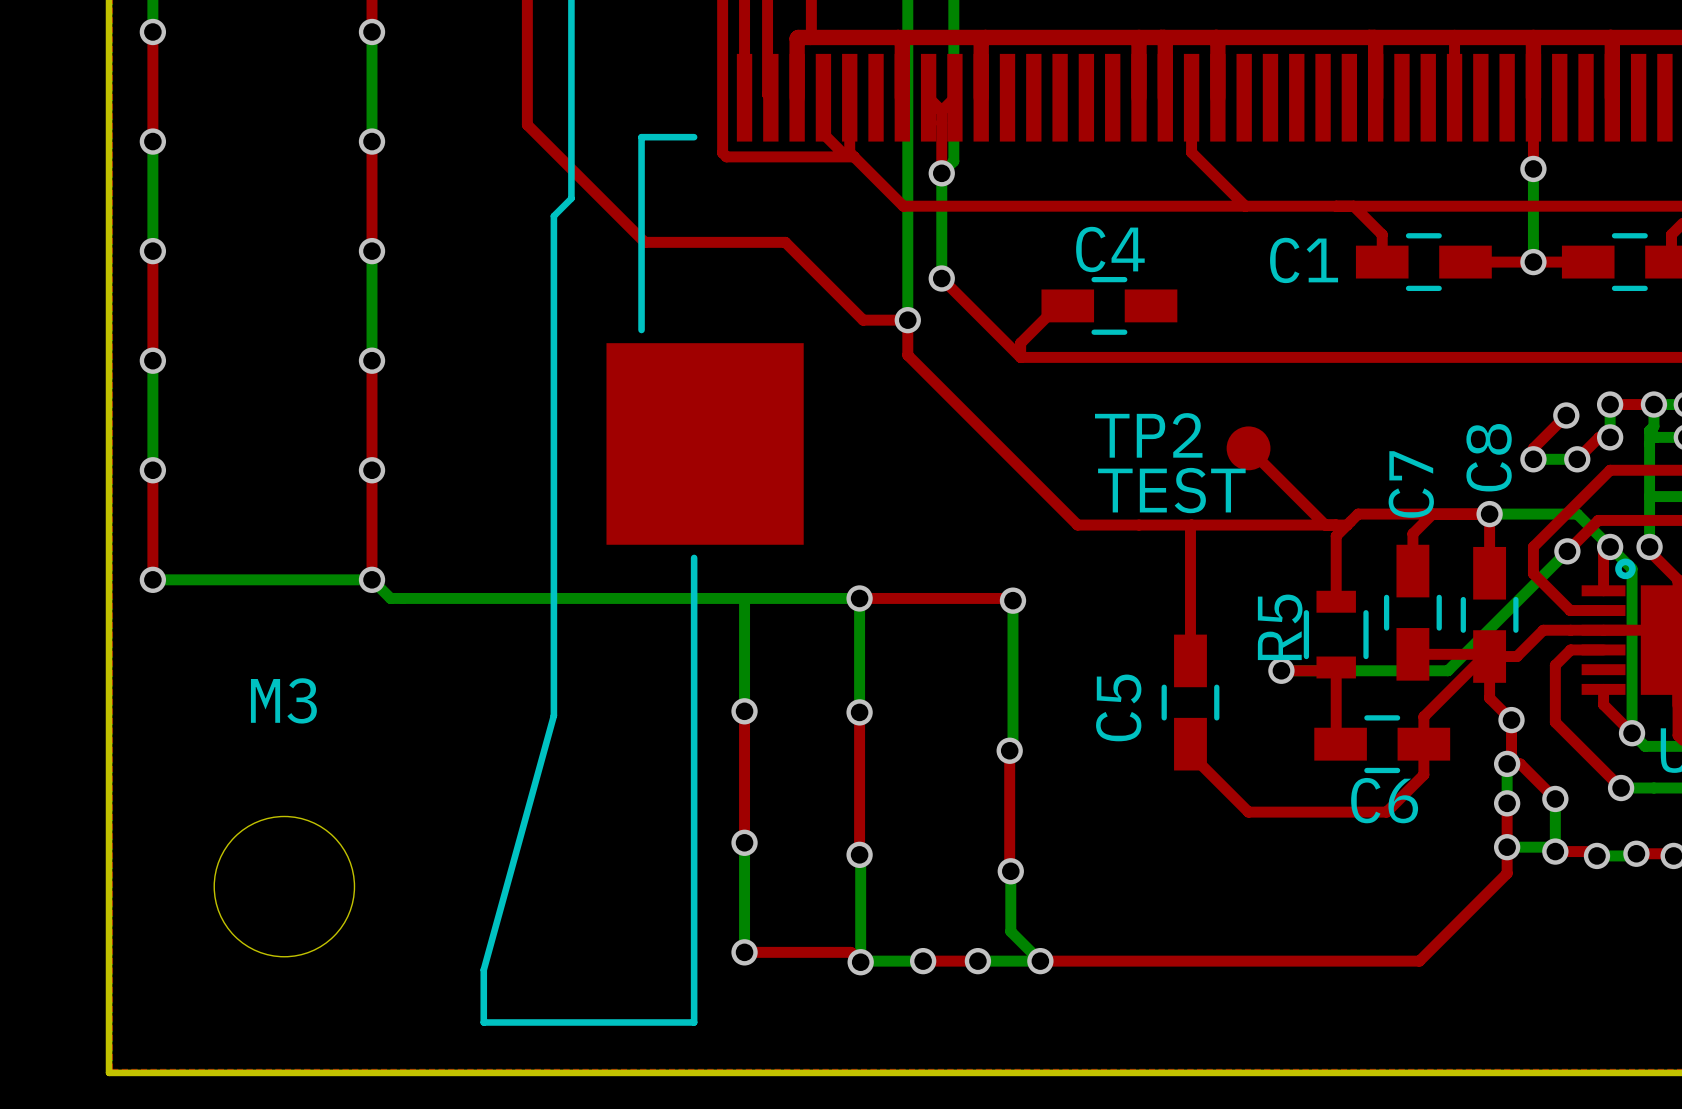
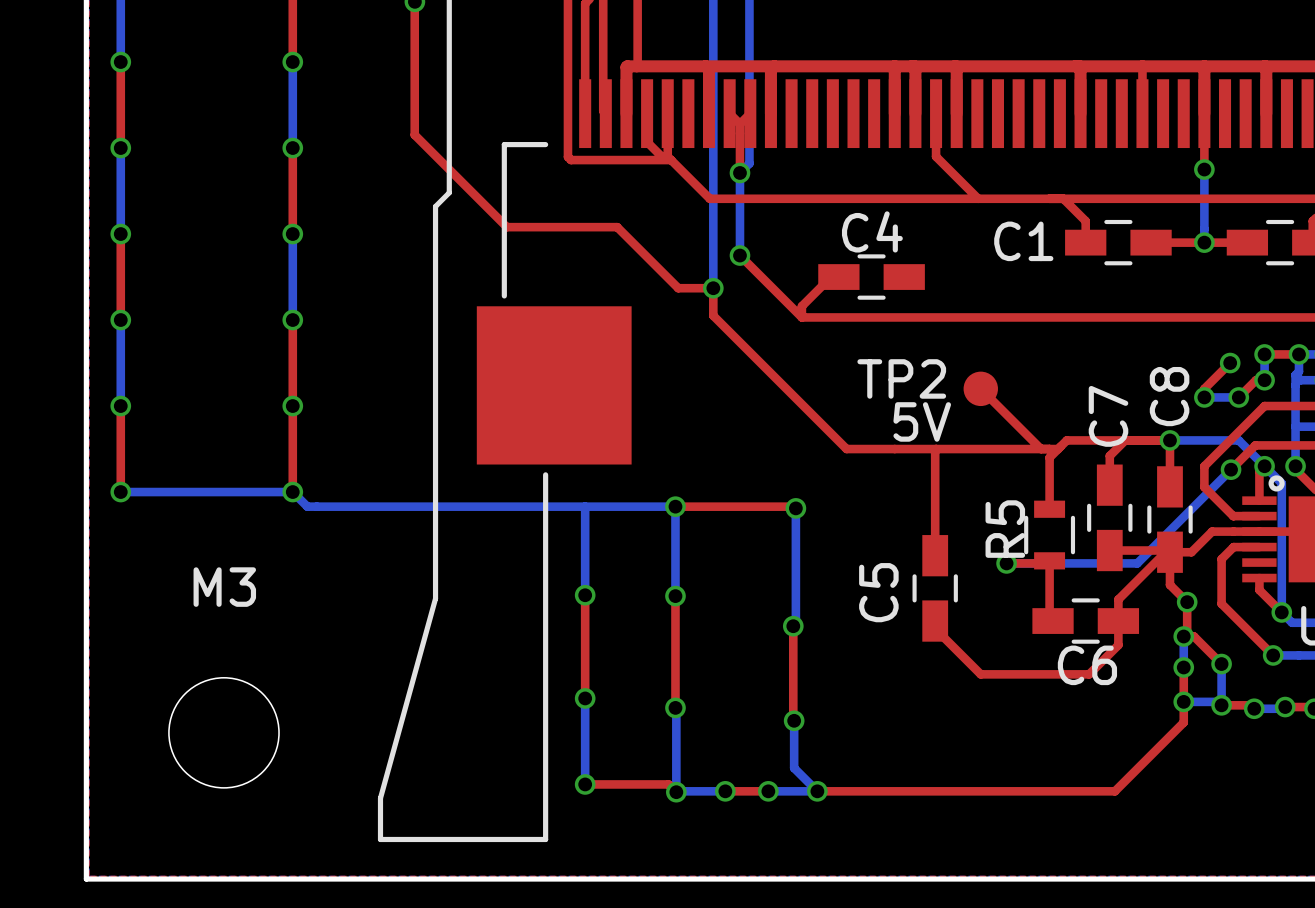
TP2 value: TEST (1171, 490) -> 5V (922, 421)

